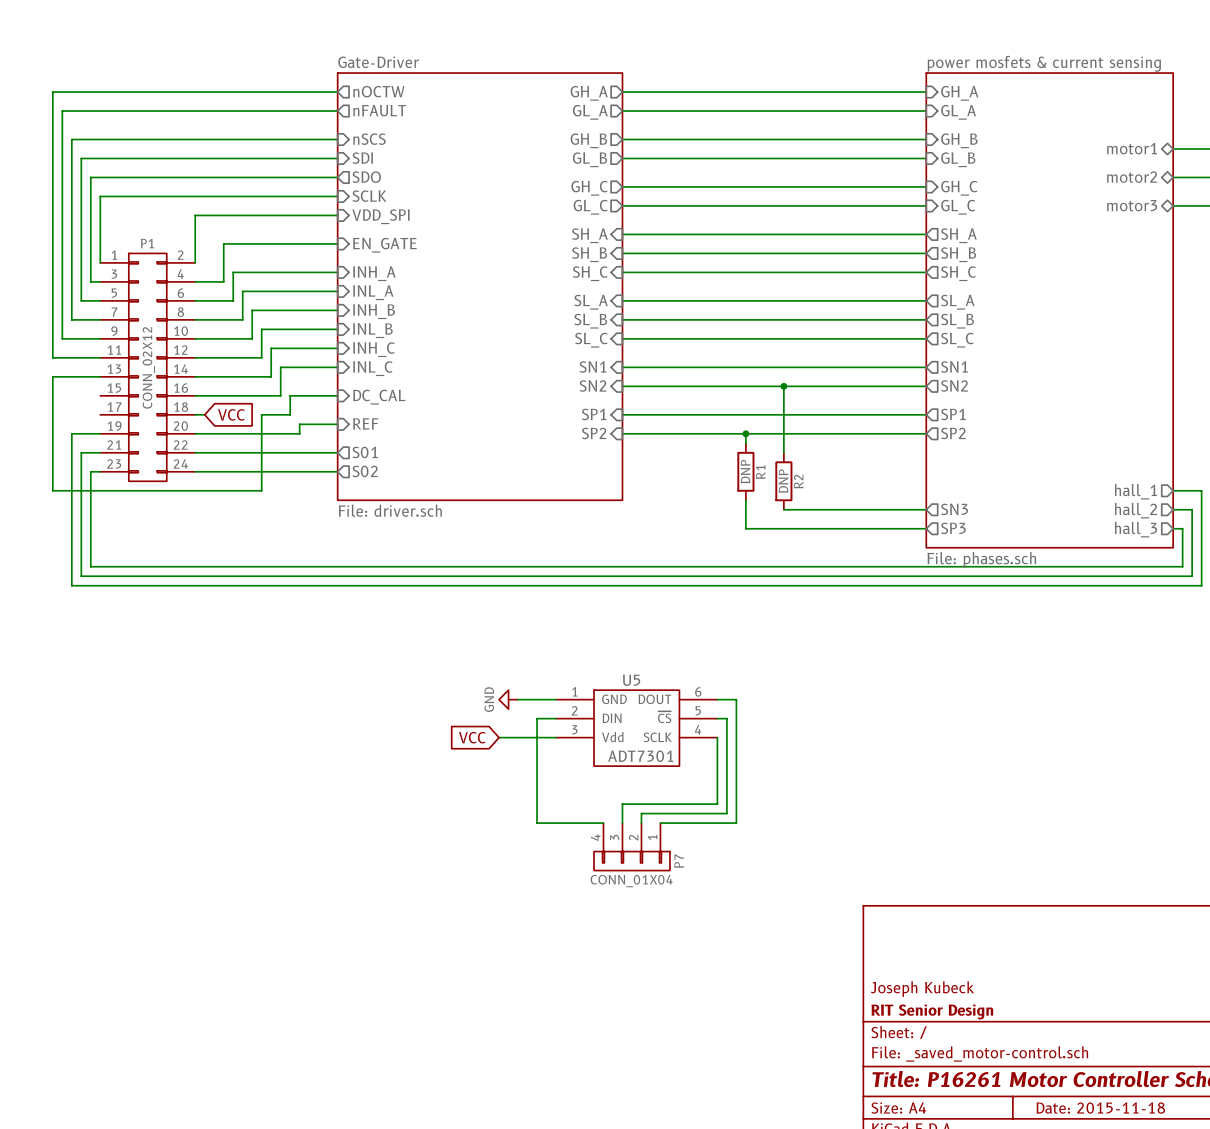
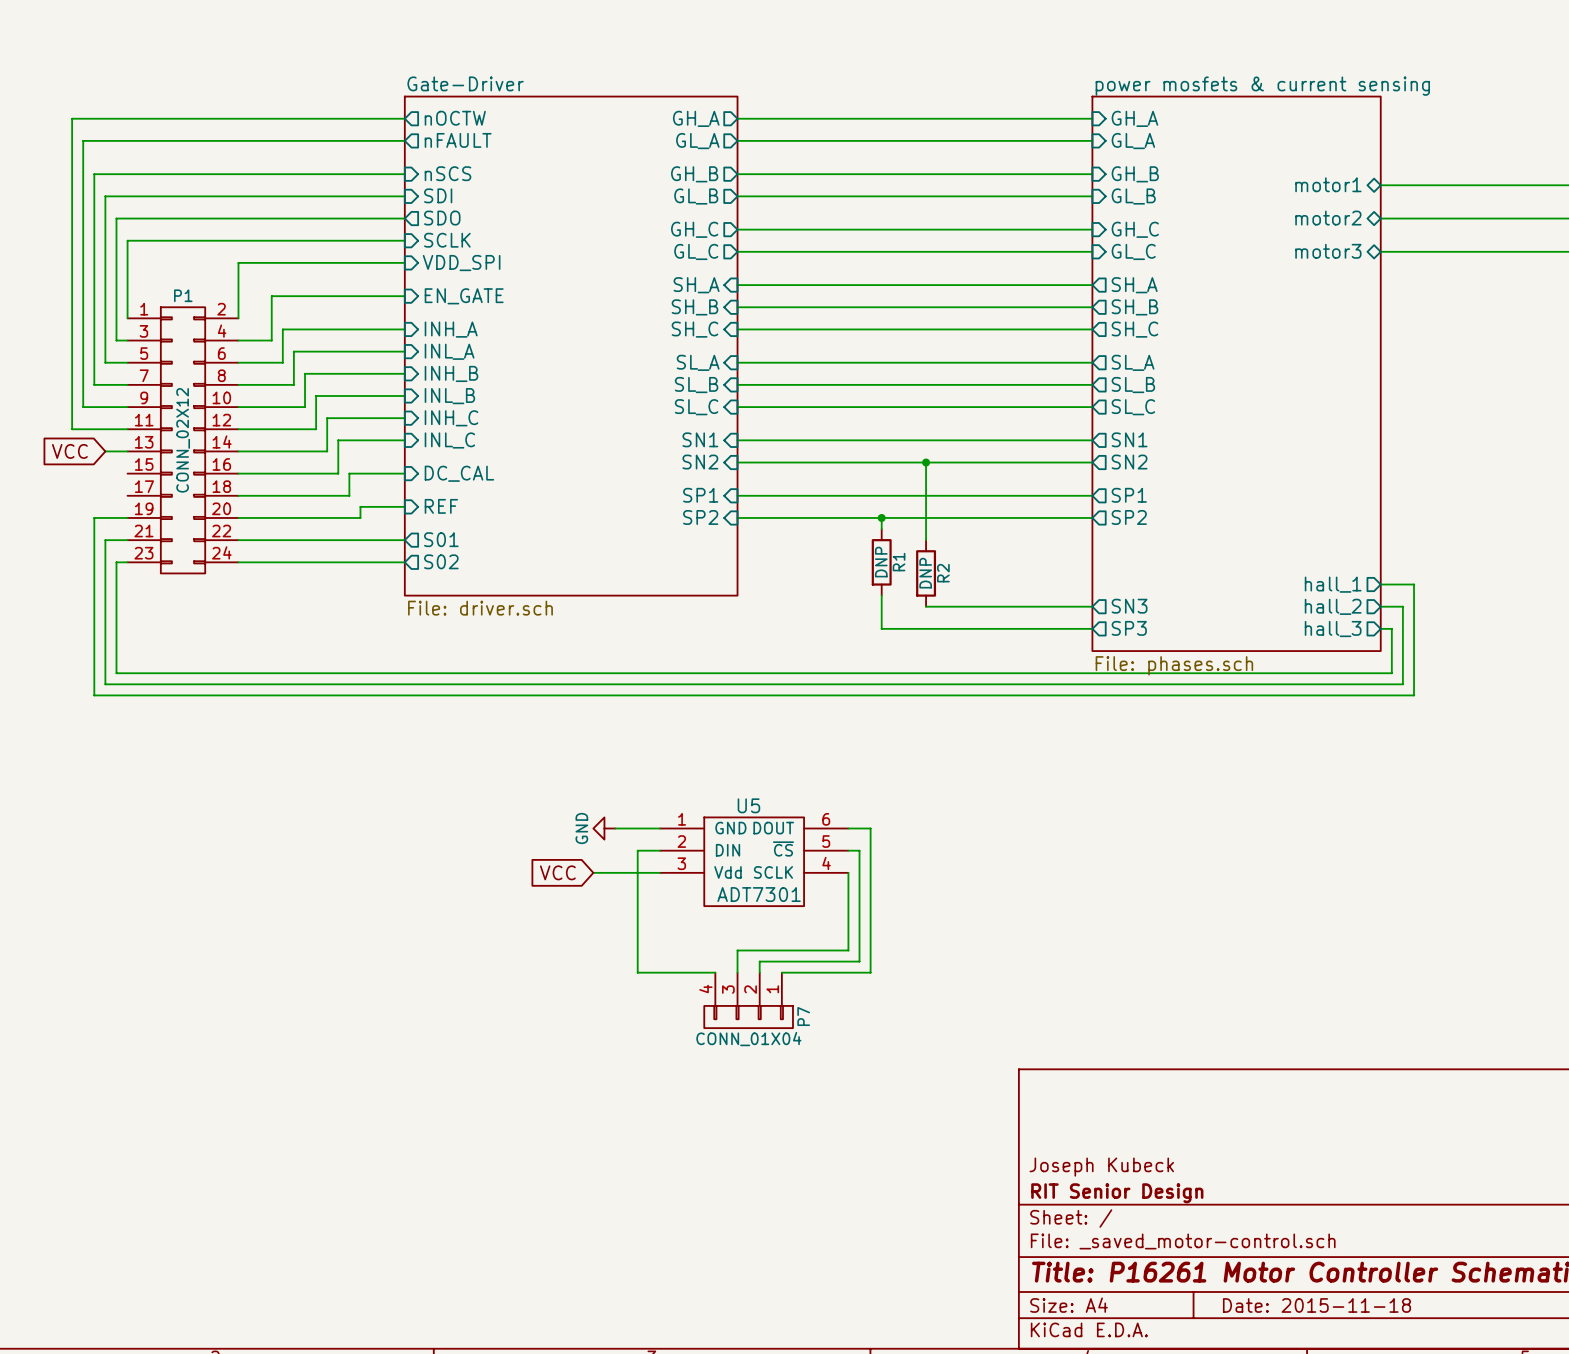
wire: (81, 376) (52, 376) (52, 490) (261, 490) (261, 414) -> (249, 495) (316, 495)
global label rotation: 0° (231, 414) -> 180° (69, 451)
global label position: VCC (231, 414) -> VCC (69, 451)

